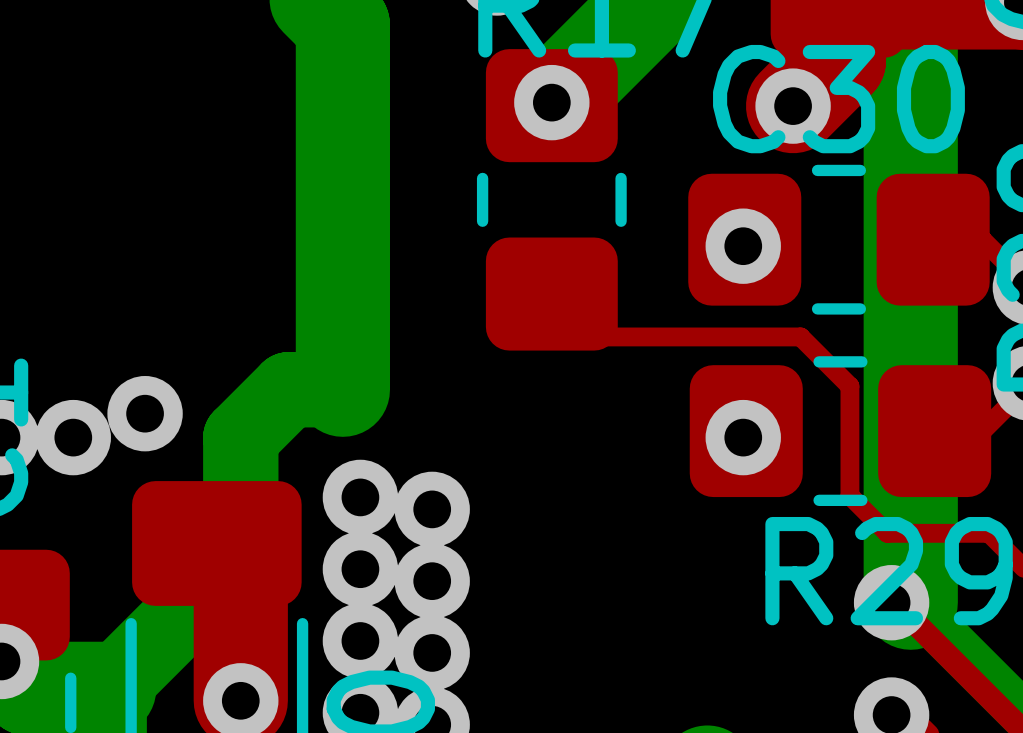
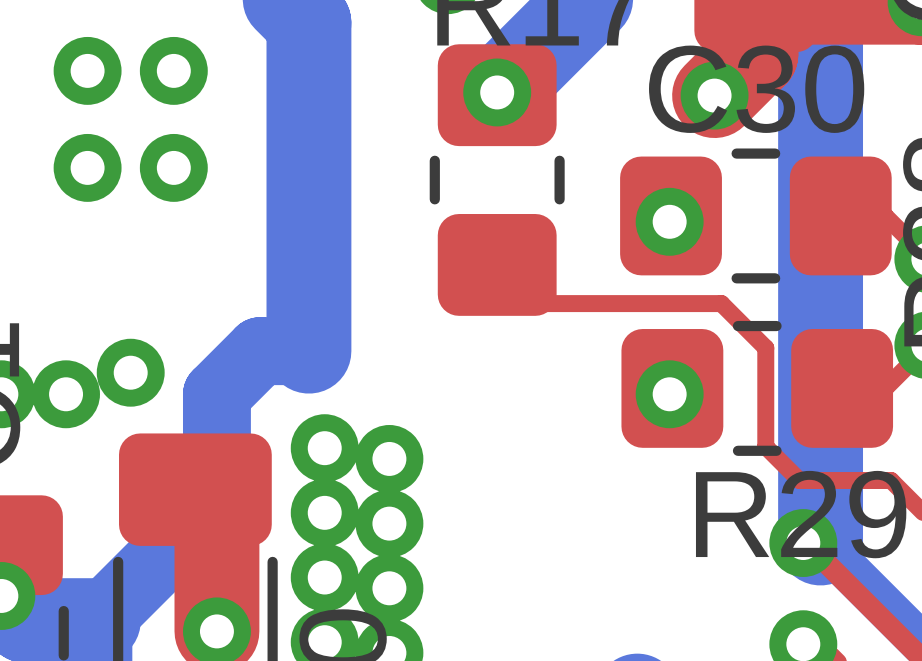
via: none -> (87, 70)
via: none -> (173, 70)
via: none -> (87, 167)
via: none -> (173, 167)

